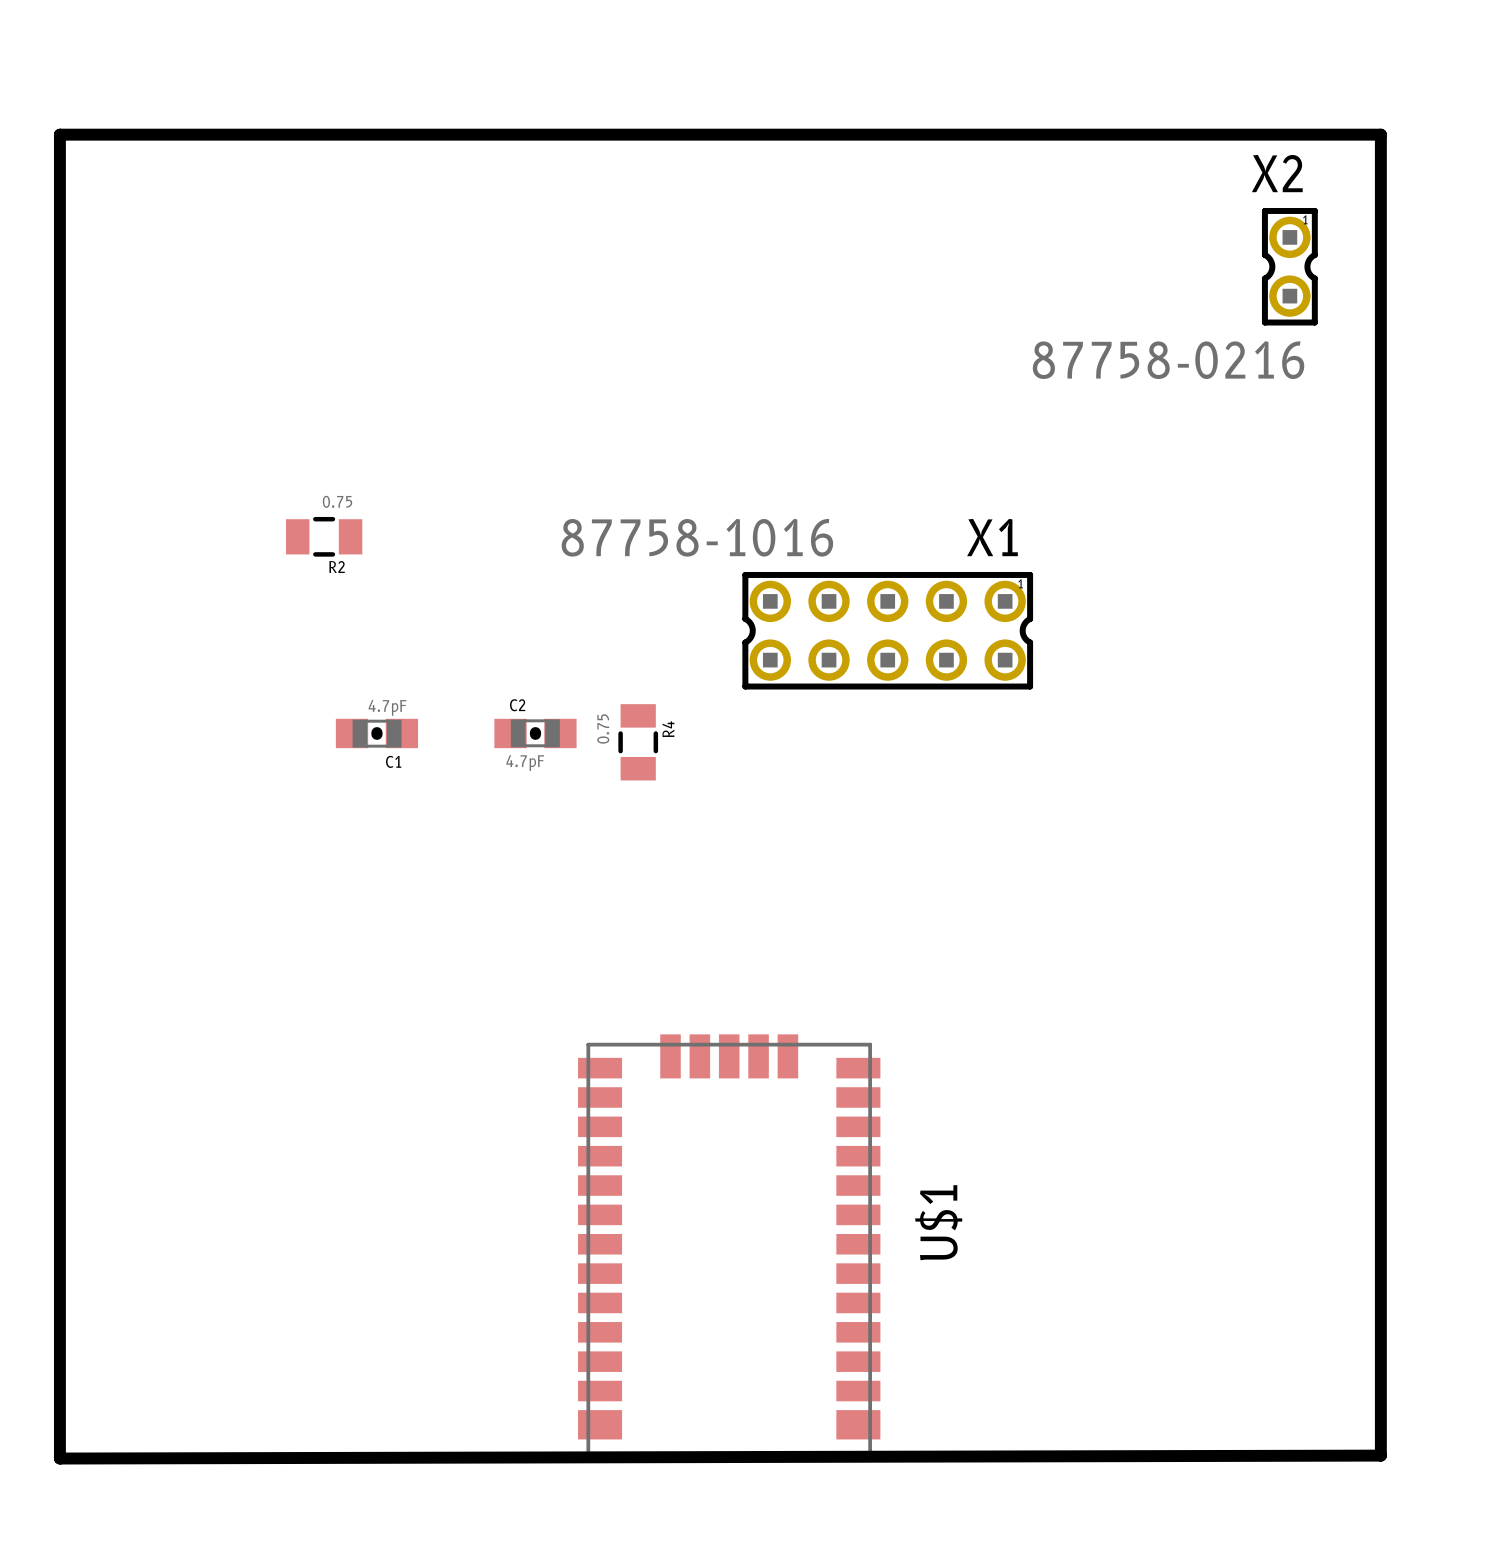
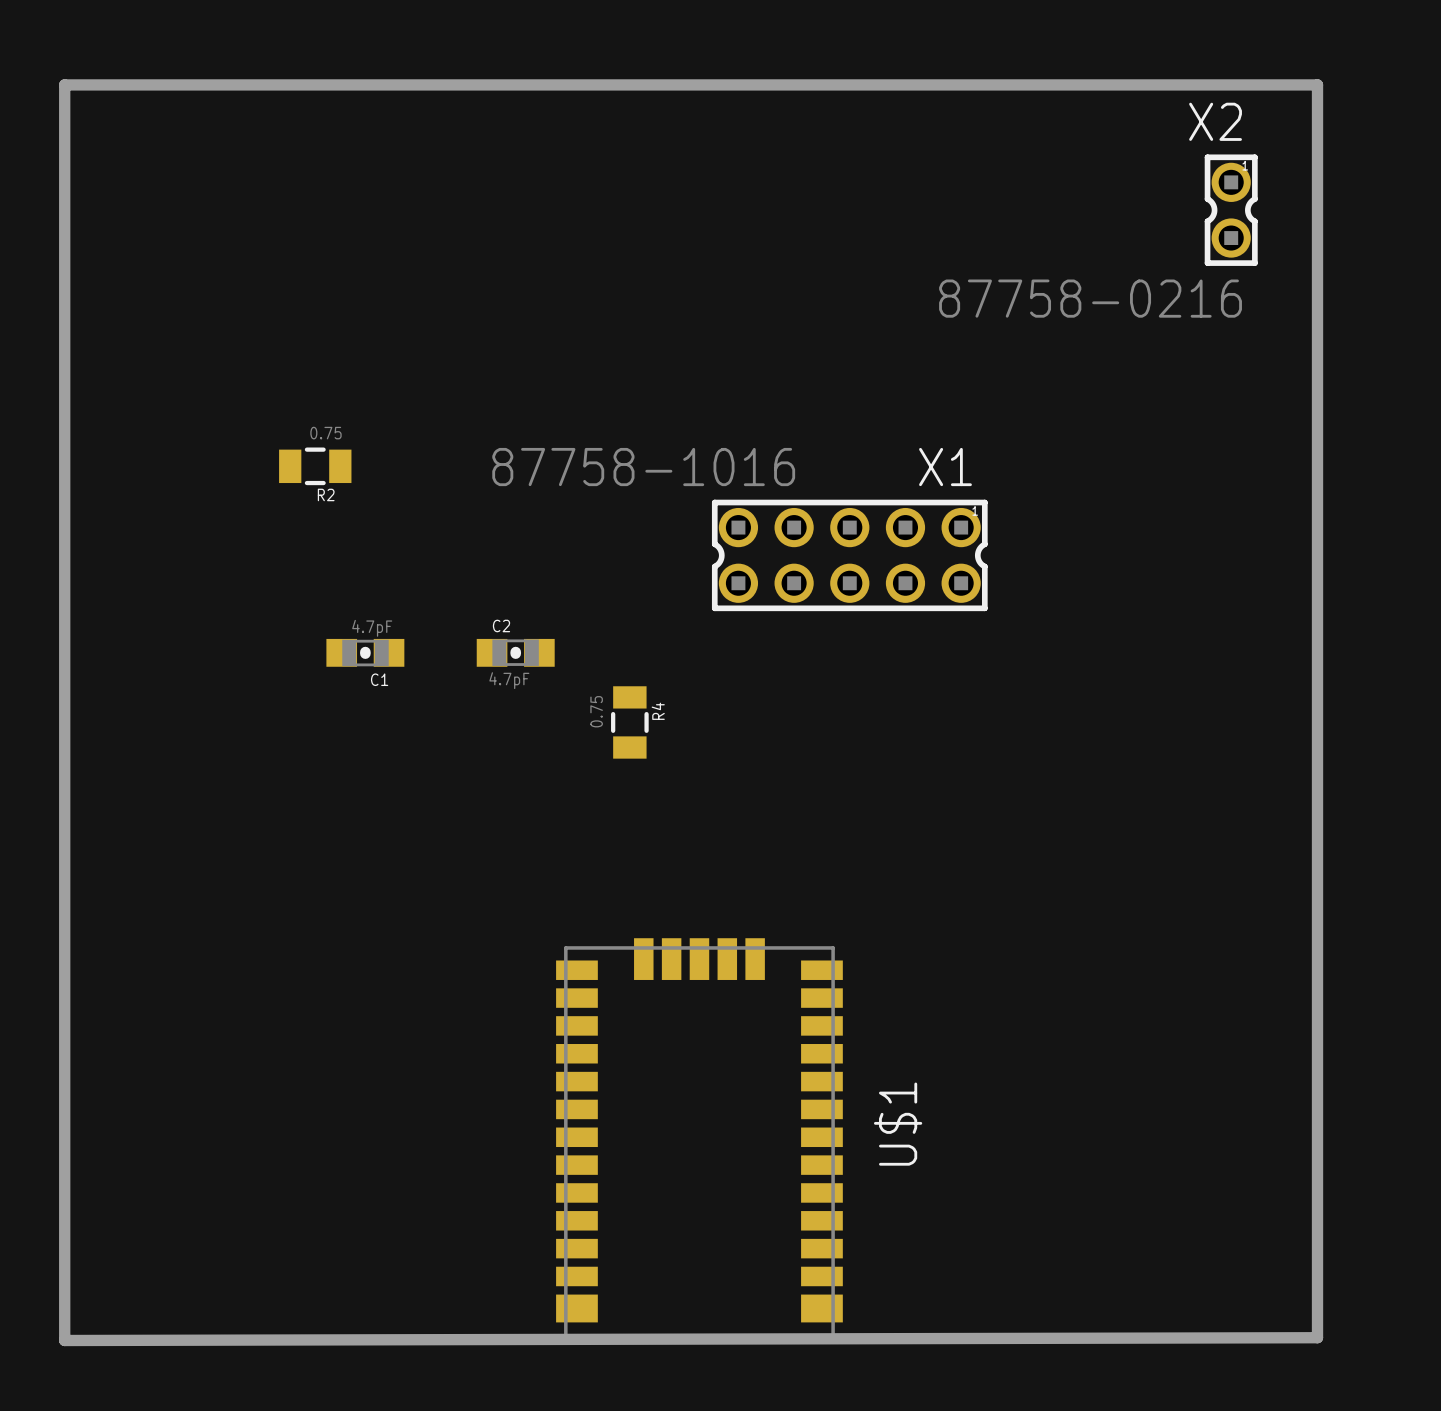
R4 position: (638, 742) -> (629, 722)

